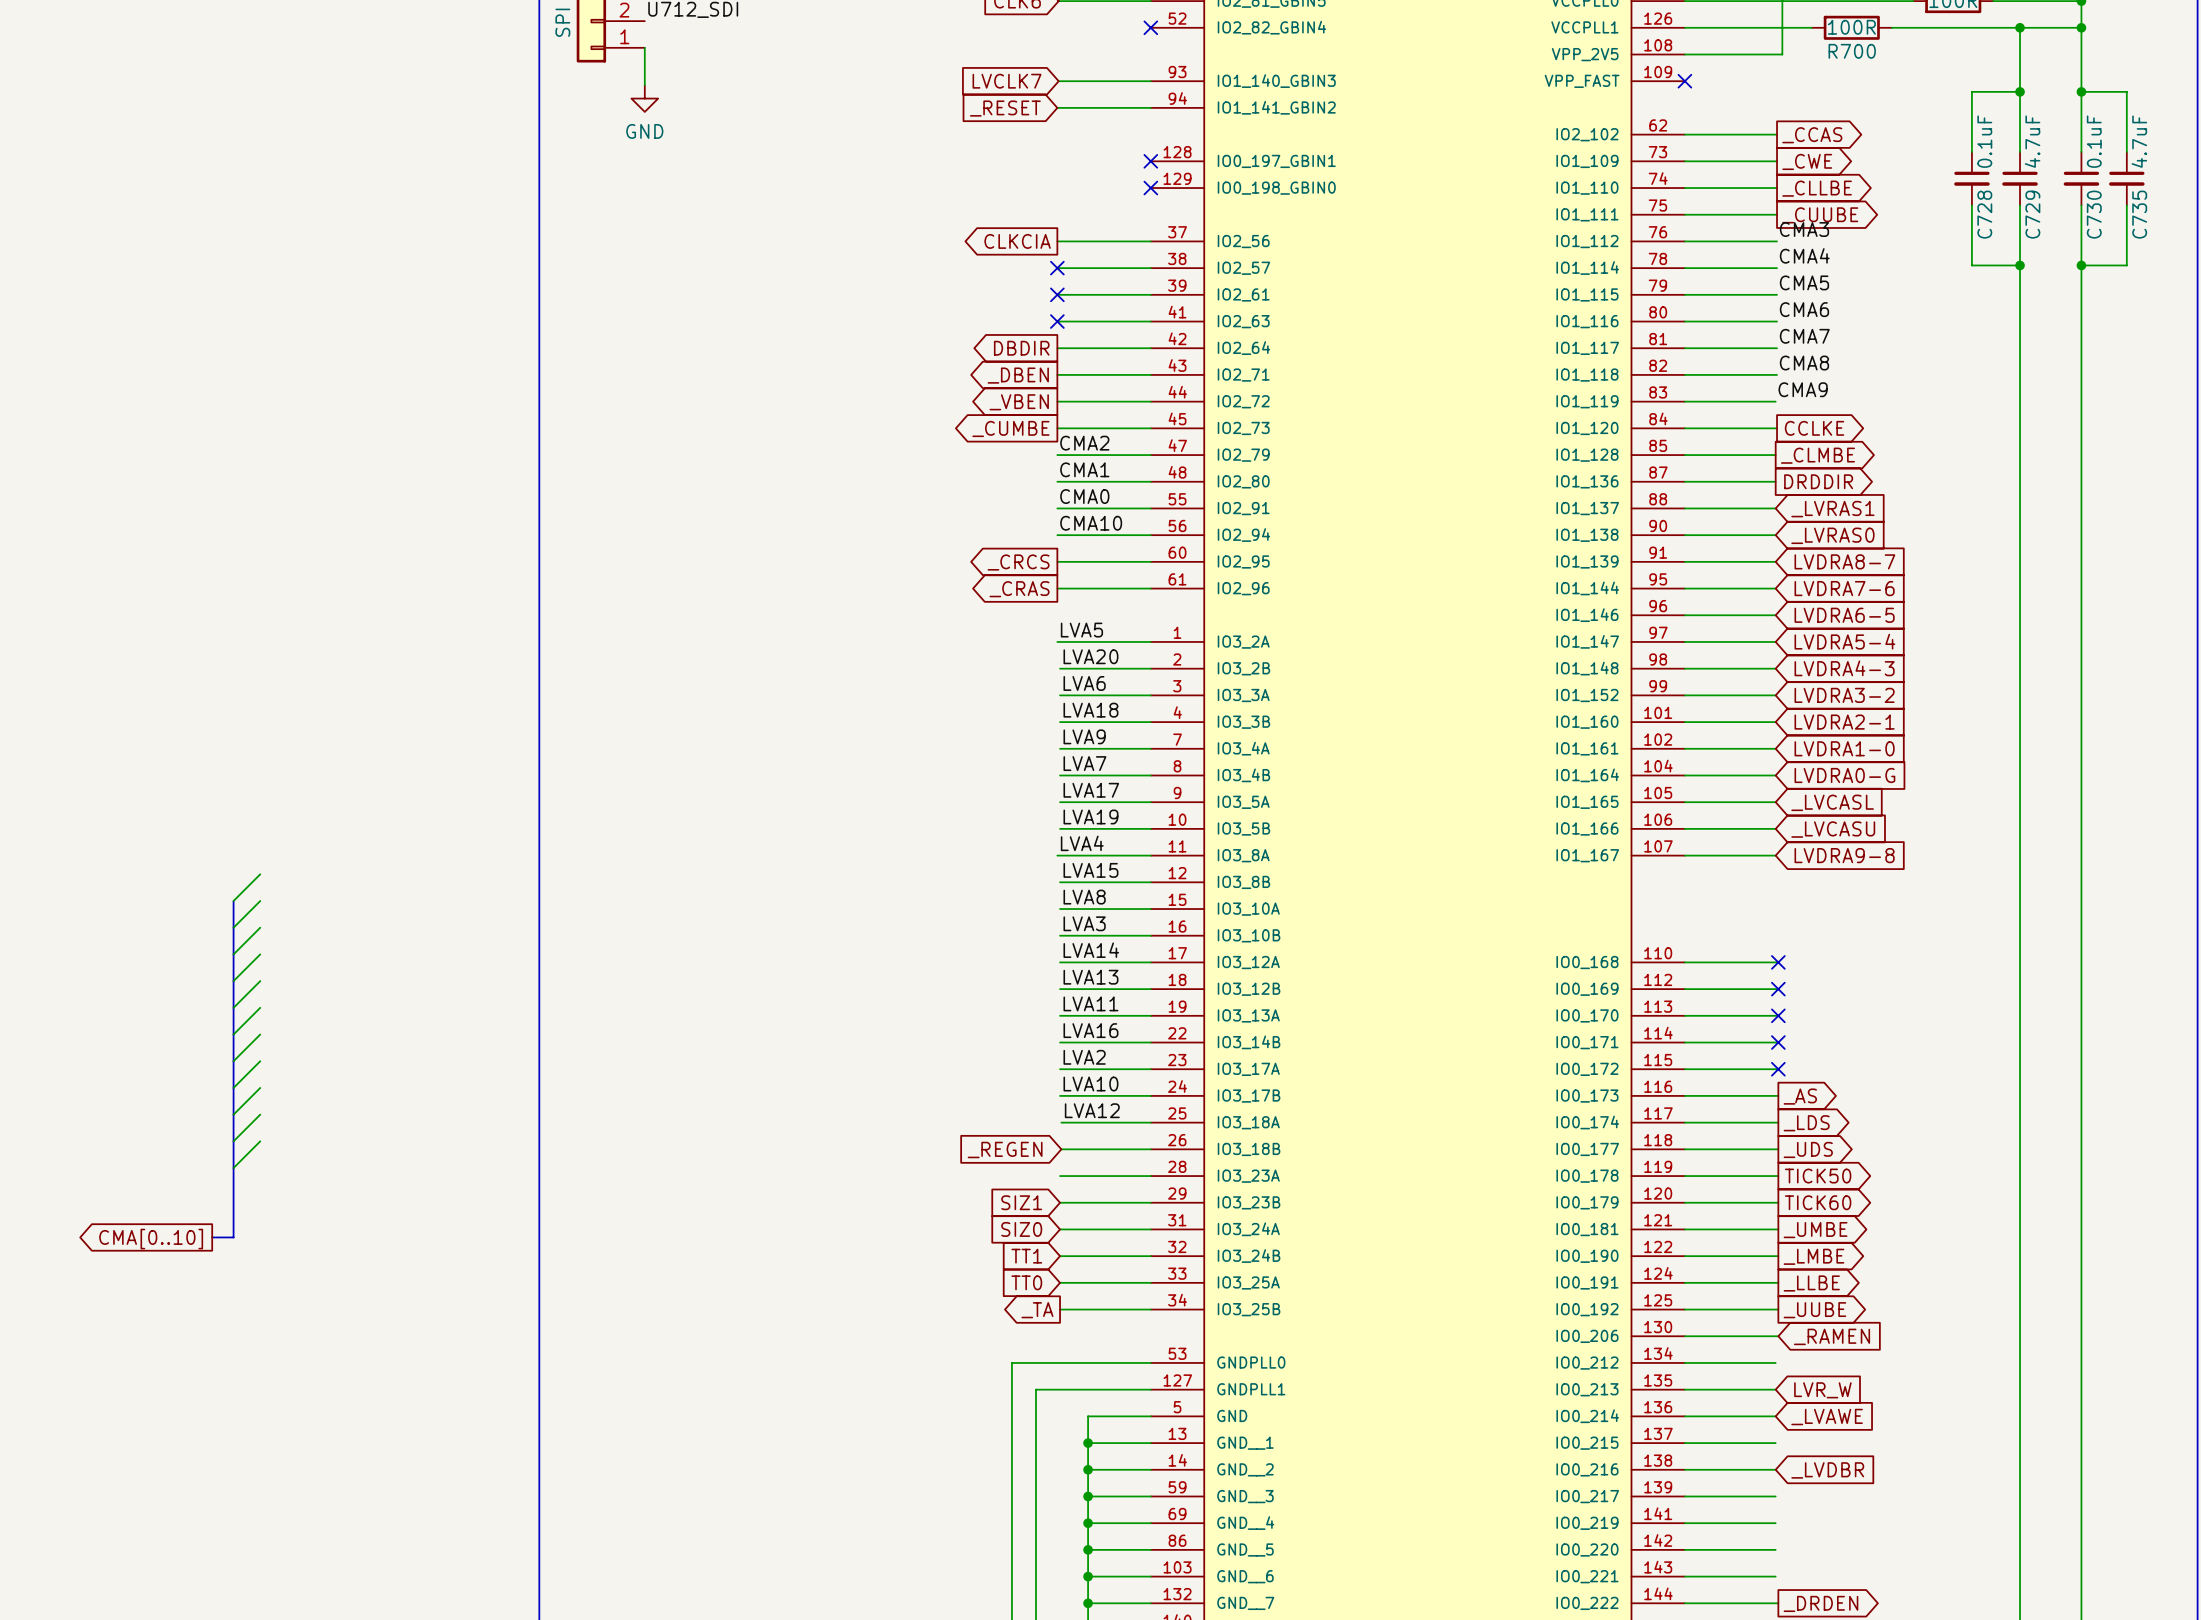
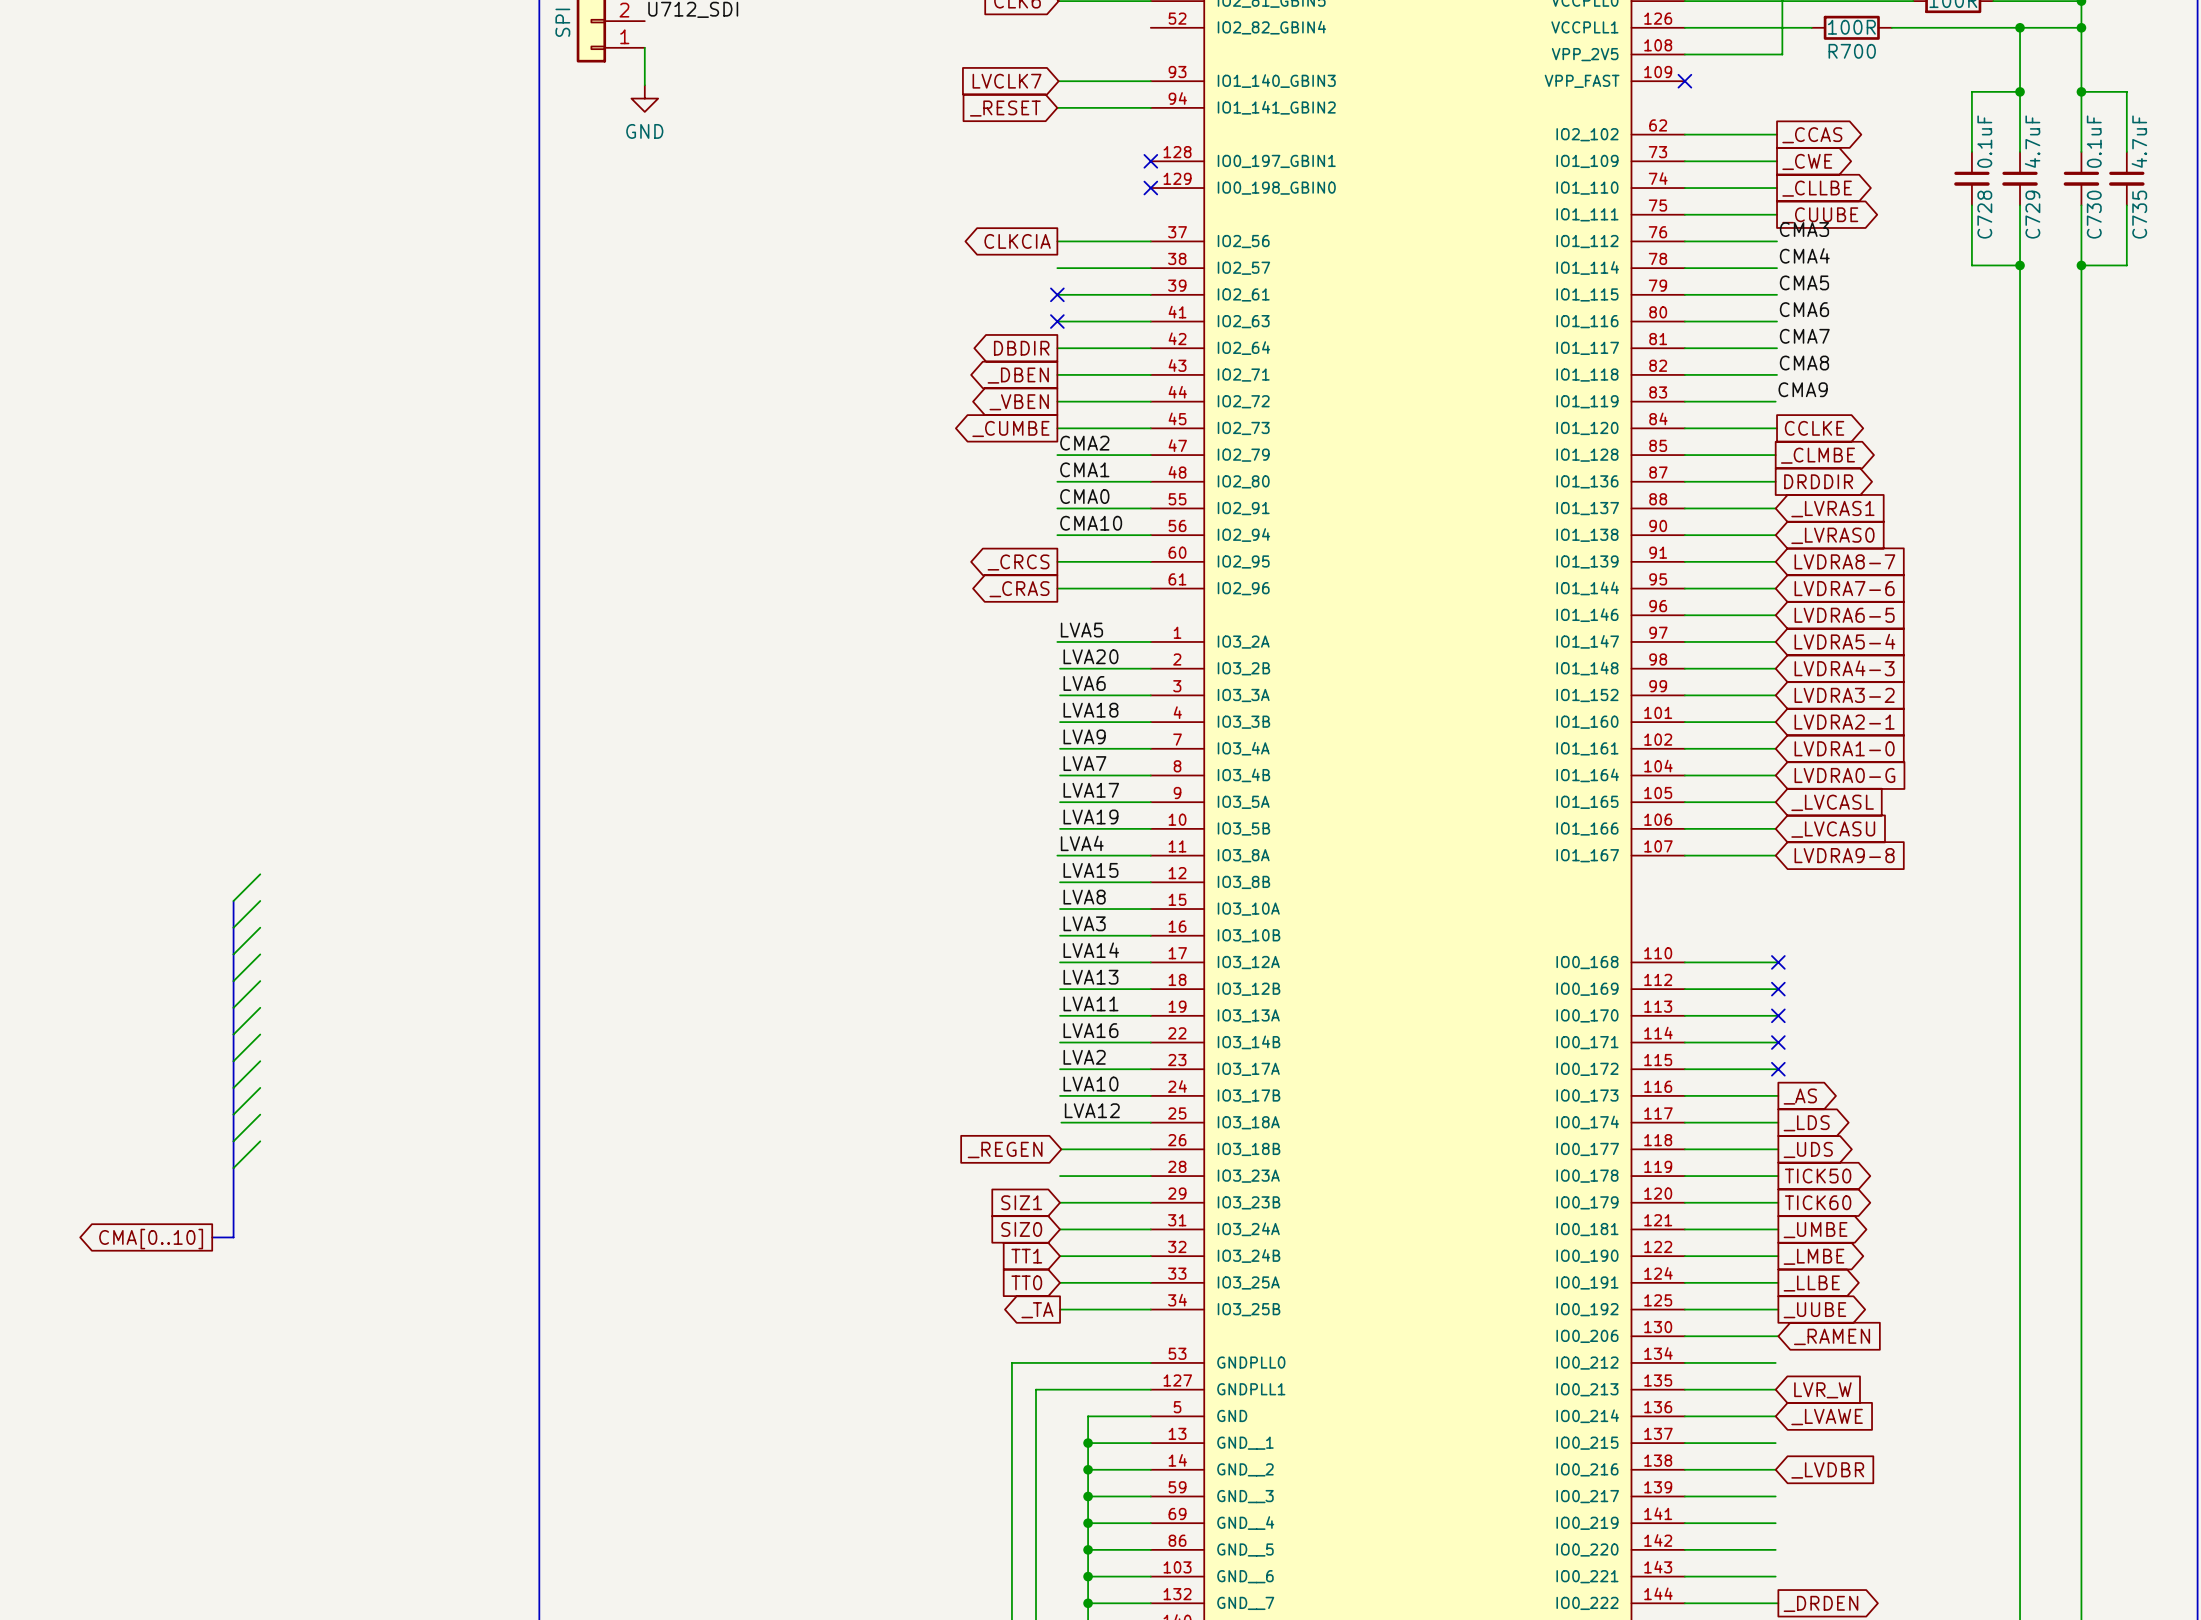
no-connect mark: (1150, 27) -> none
no-connect mark: (1057, 268) -> none

